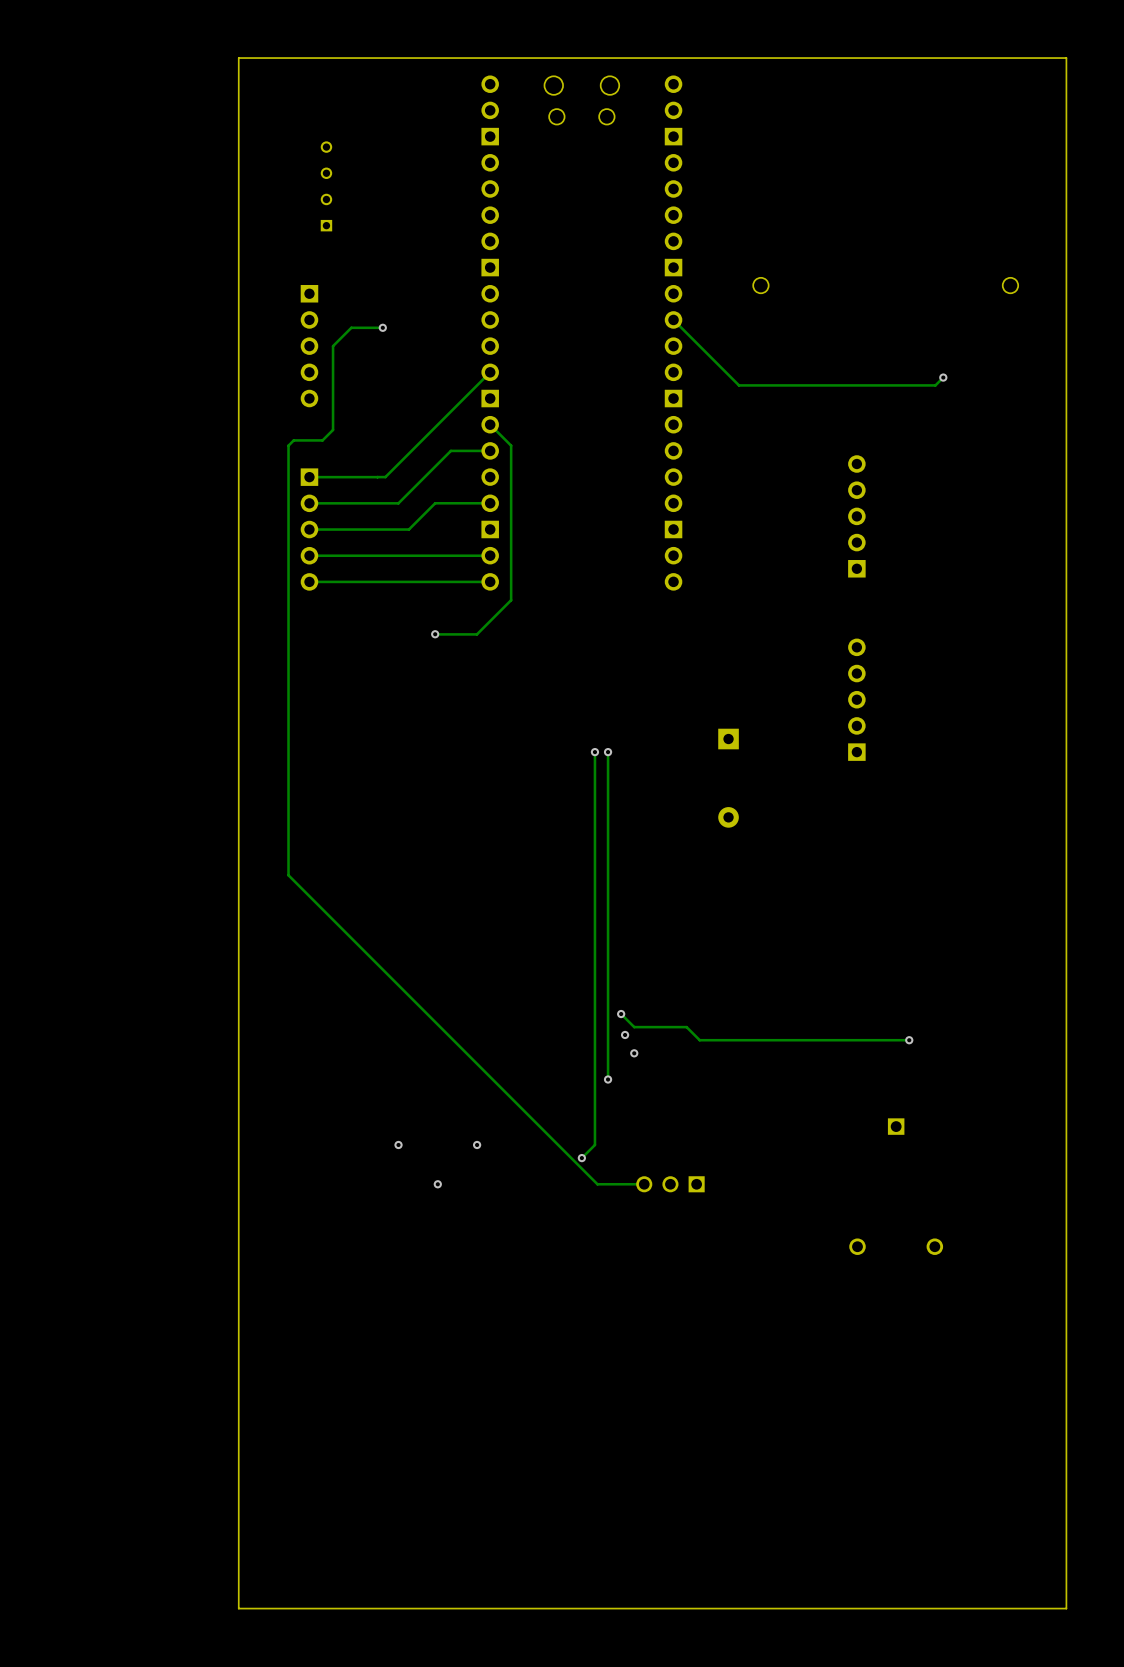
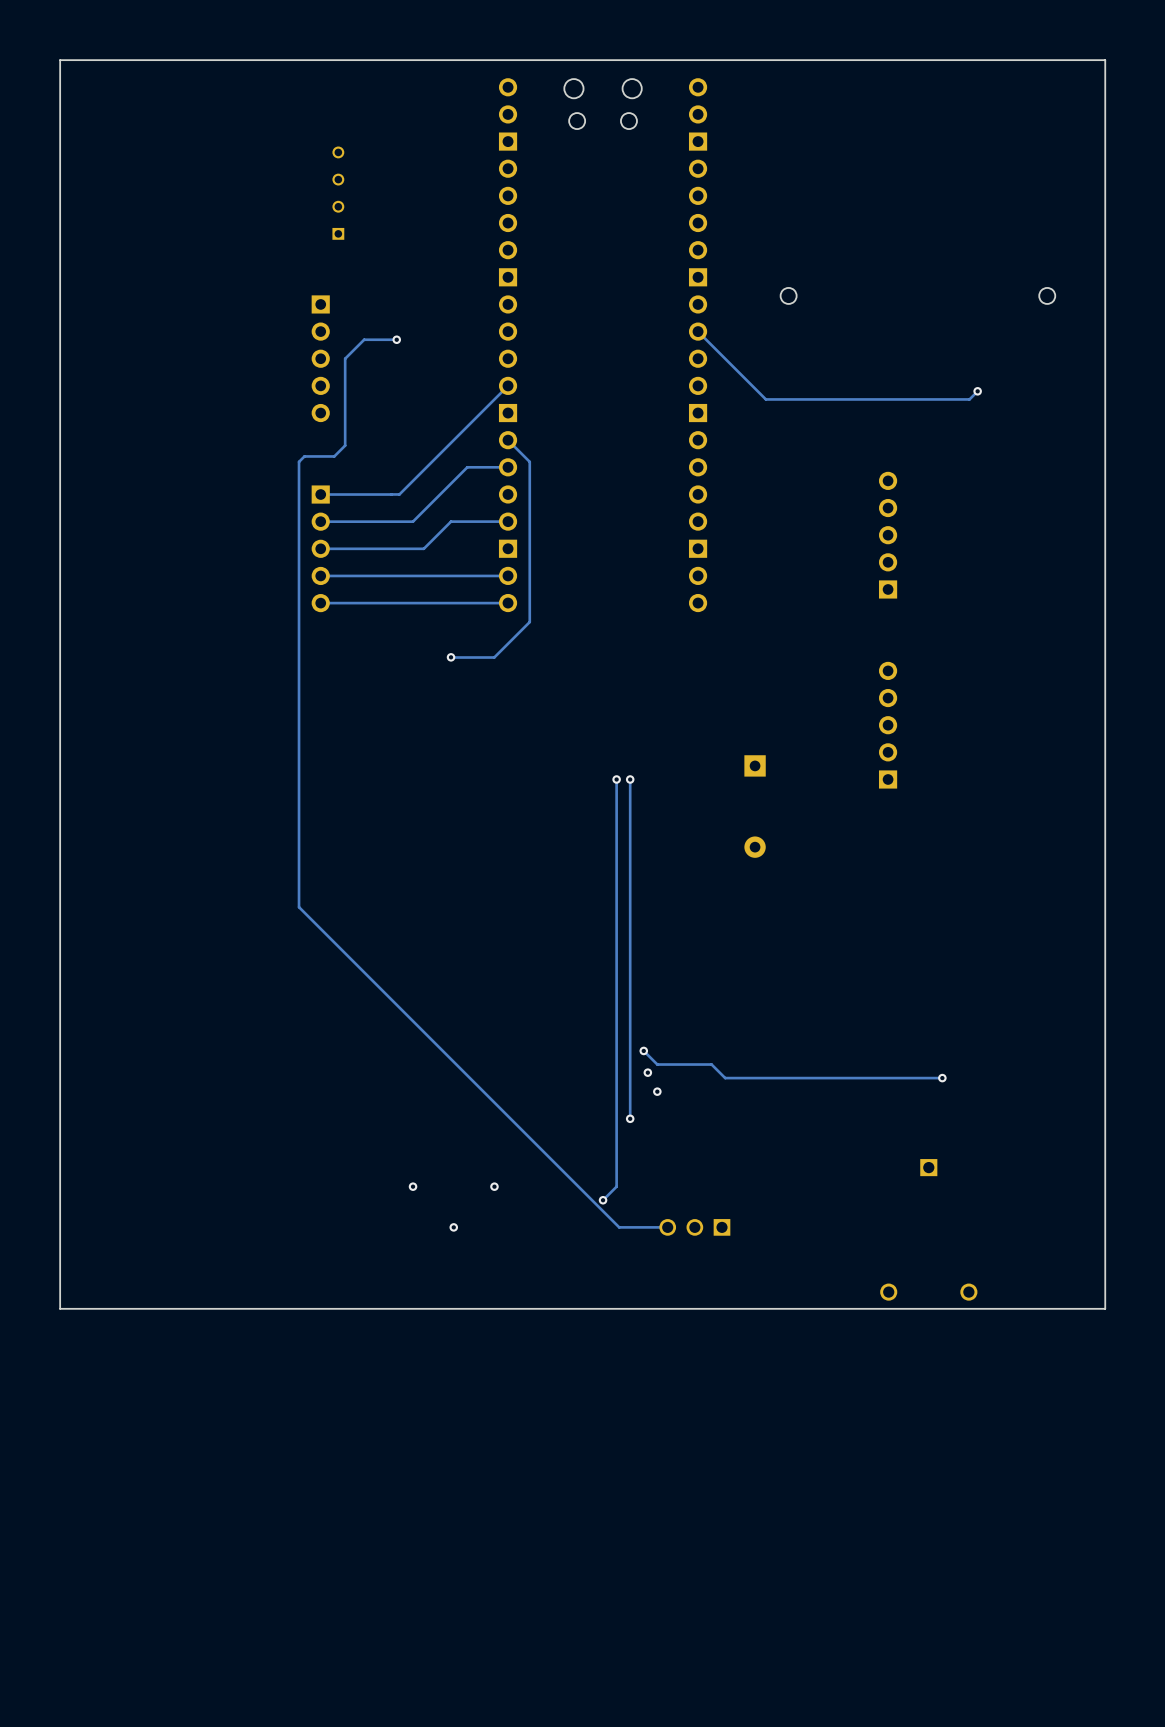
board edge: (238, 58) (238, 1608) (1066, 1608) (1066, 1262) -> (247, 60) (60, 60) (60, 1308) (1105, 1308)

